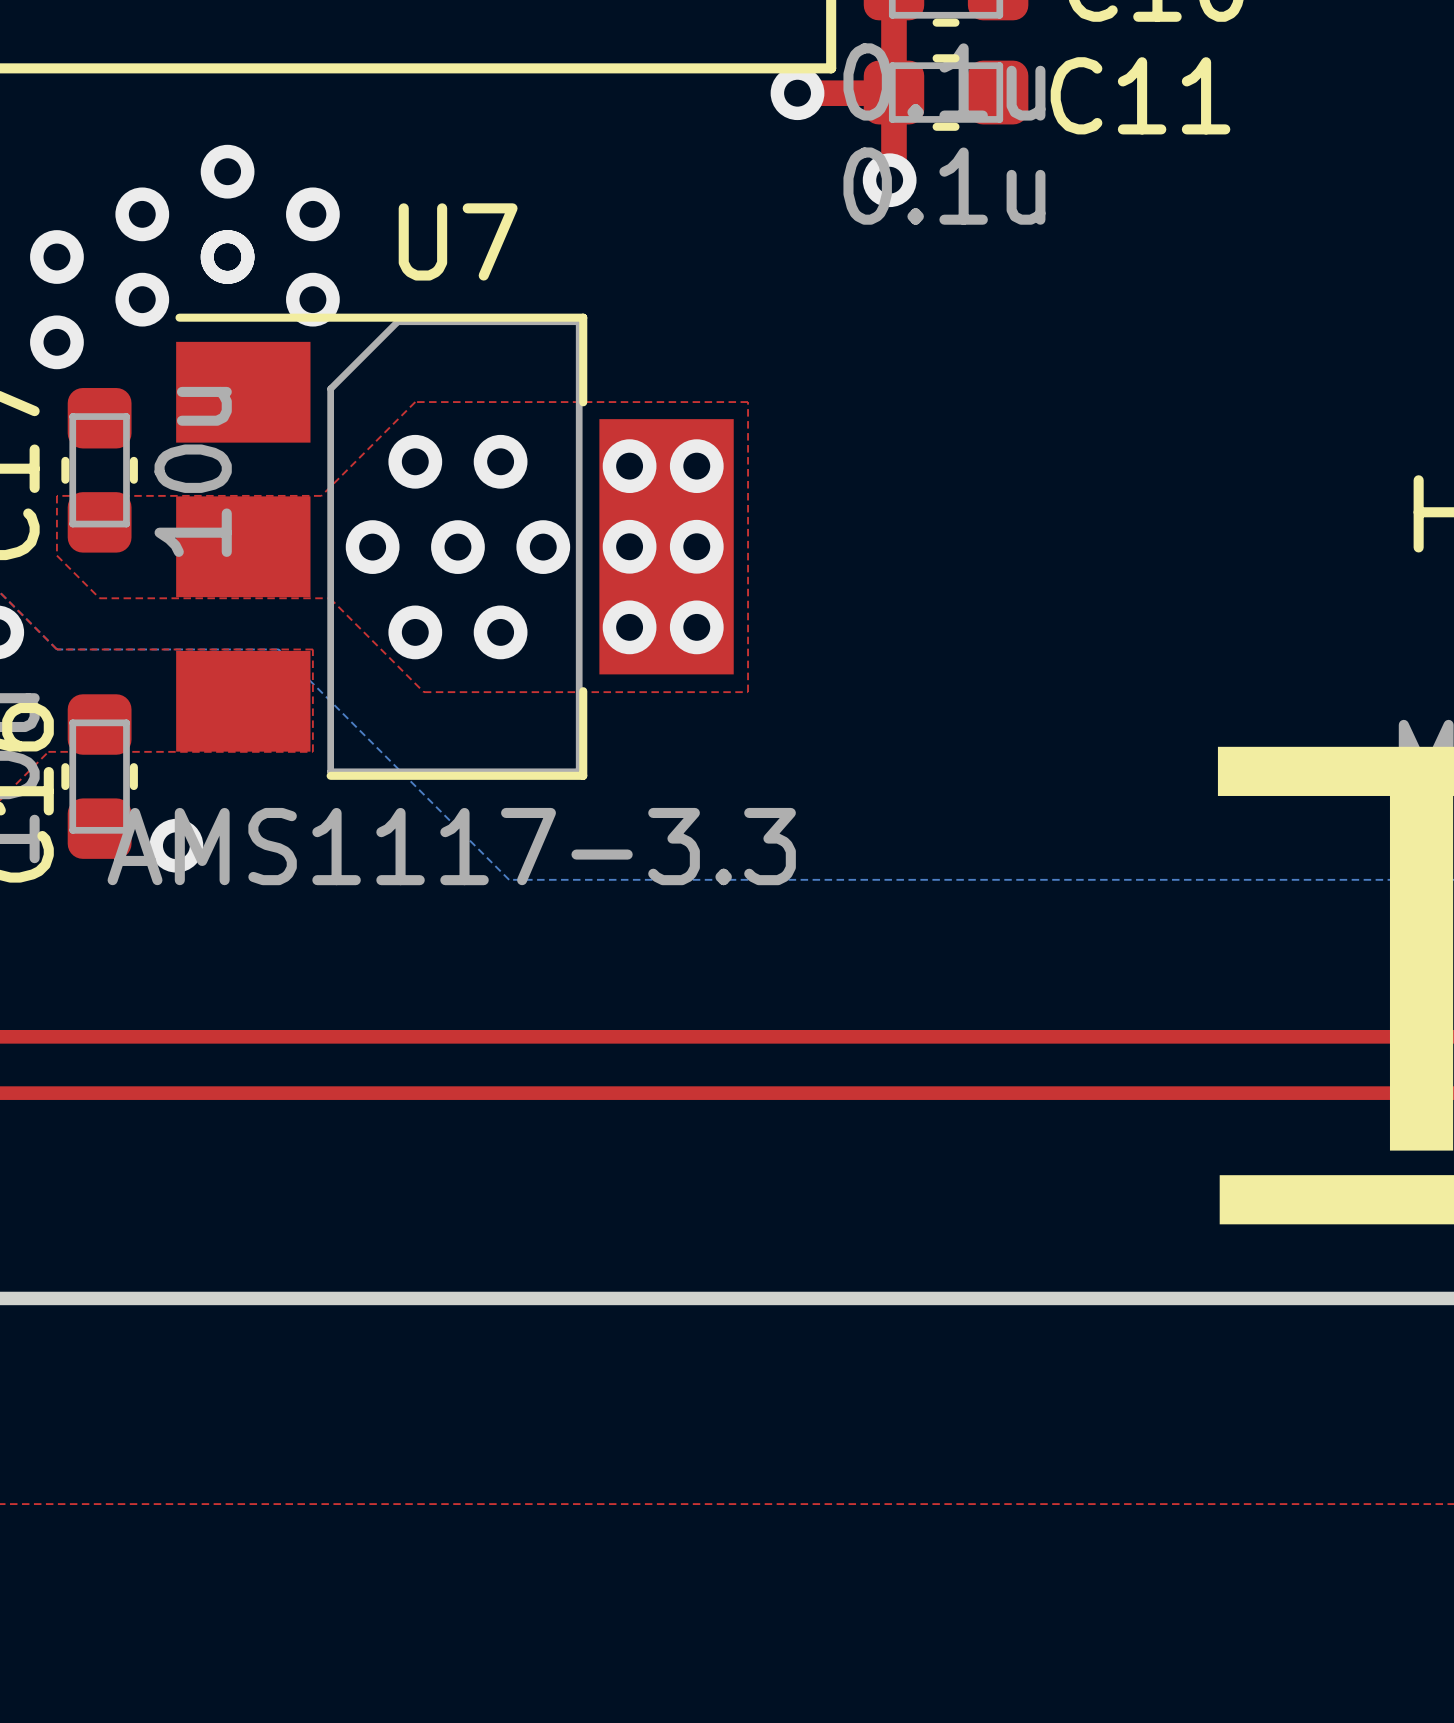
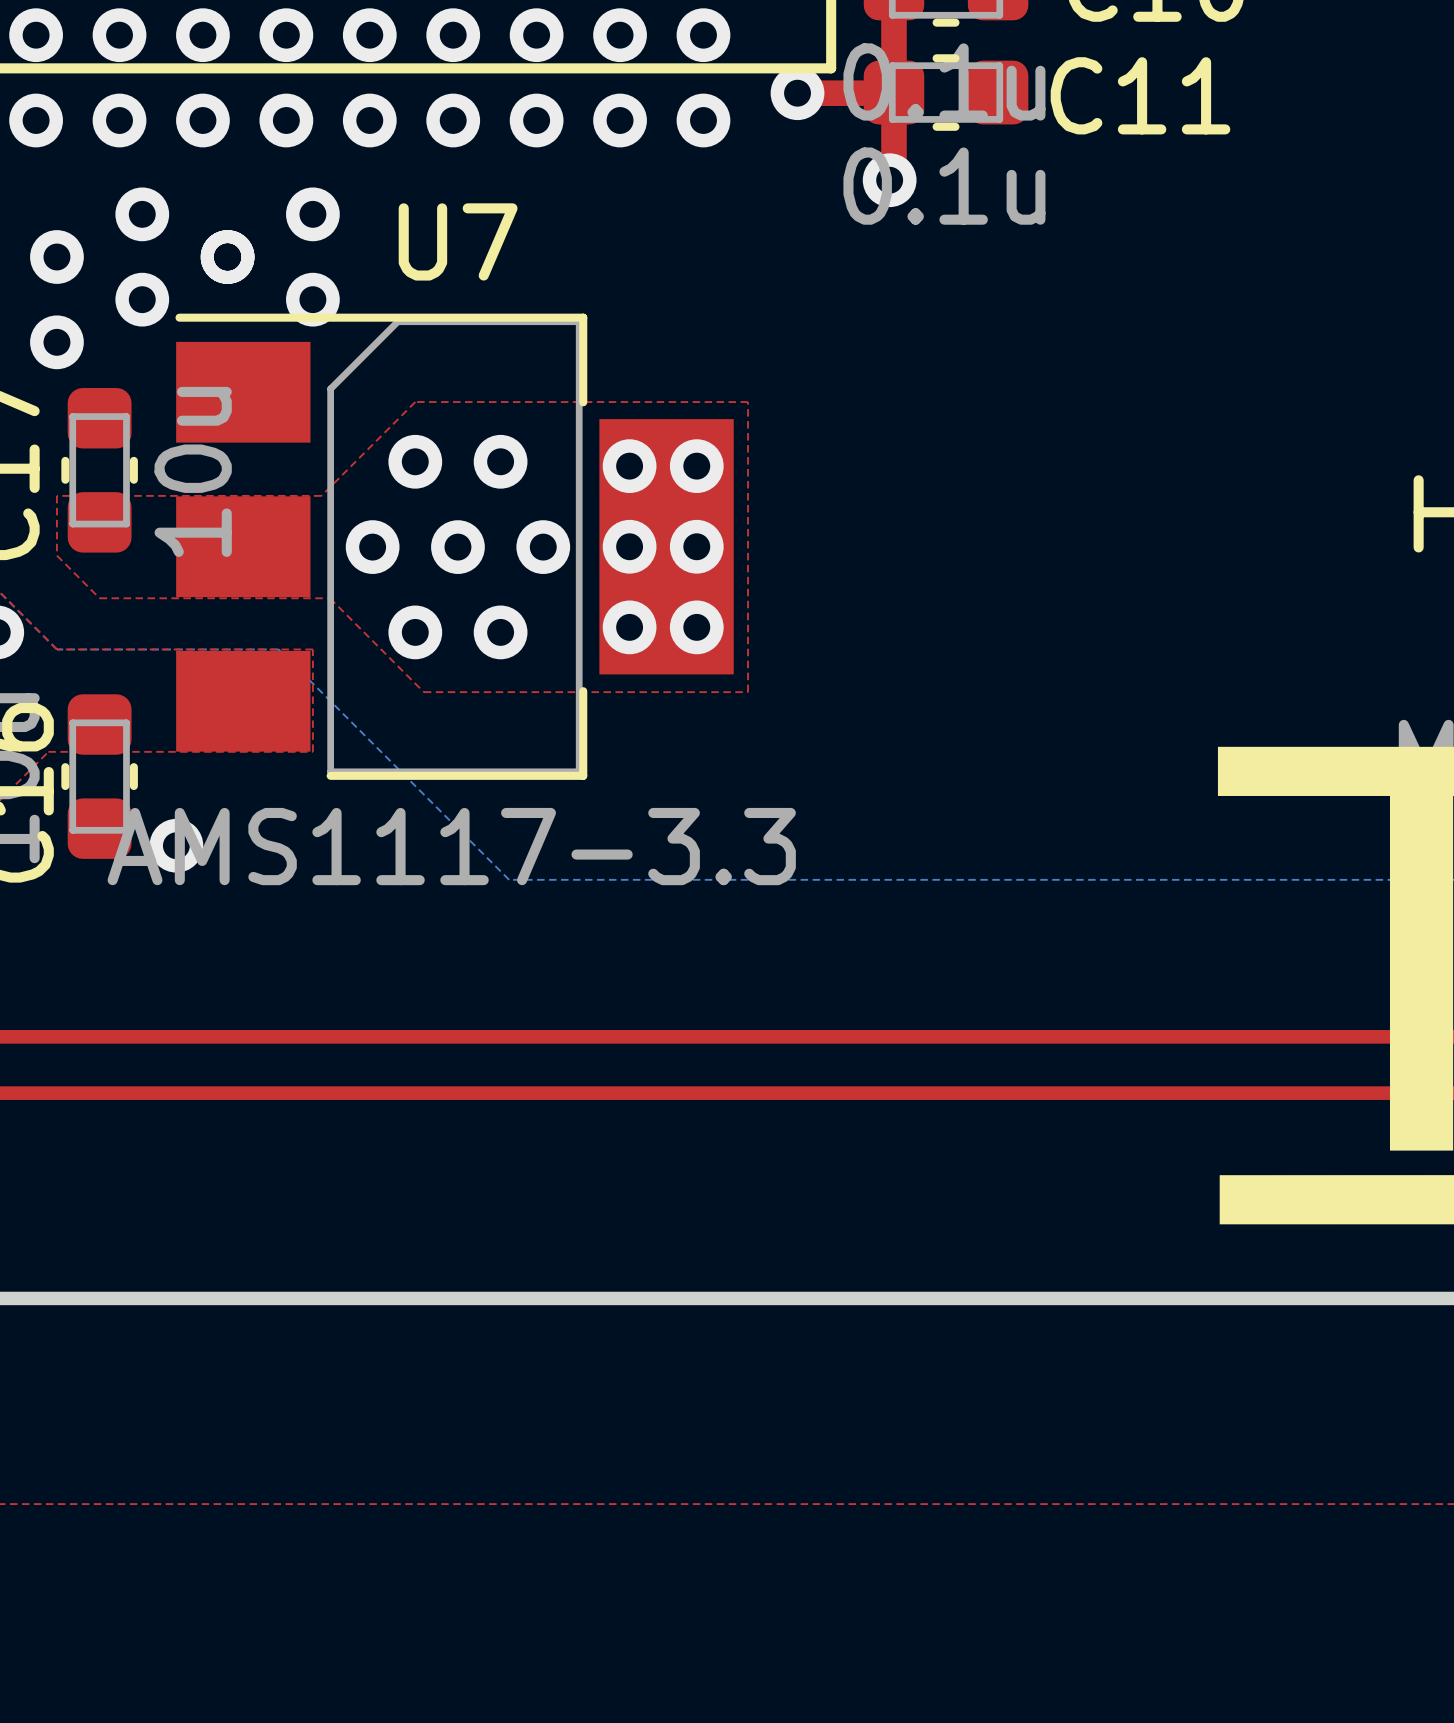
via: none -> (36, 35)
via: none -> (119, 35)
via: none -> (202, 35)
via: none -> (286, 35)
via: none -> (369, 35)
via: none -> (453, 35)
via: none -> (536, 35)
via: none -> (620, 35)
via: none -> (703, 35)
via: none -> (36, 120)
via: none -> (119, 120)
via: none -> (286, 120)
via: none -> (369, 120)
via: none -> (453, 120)
via: none -> (536, 120)
via: none -> (620, 120)
via: none -> (703, 120)
via position: (227, 171) -> (202, 120)

